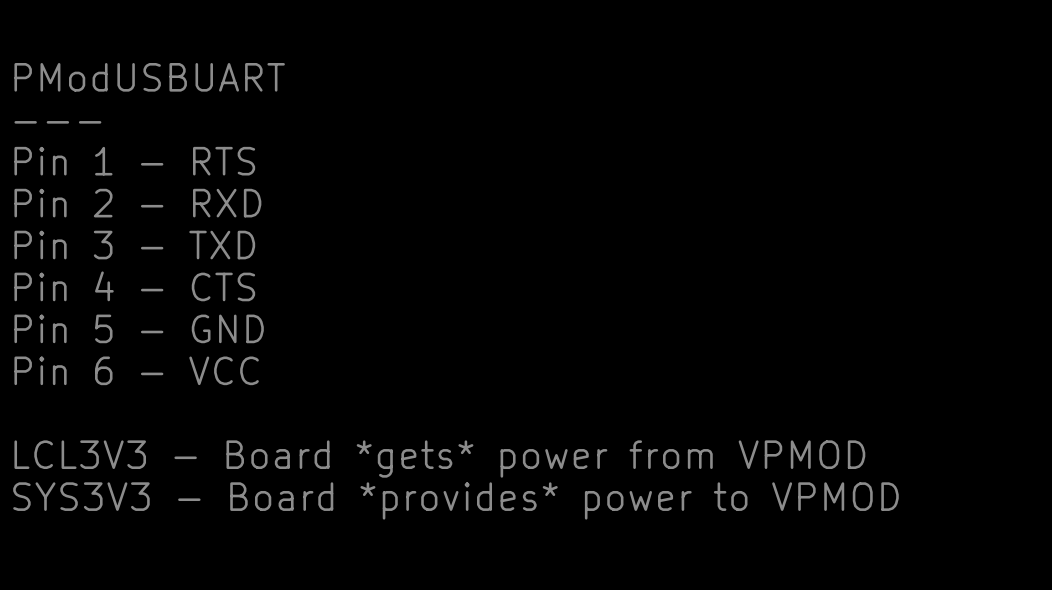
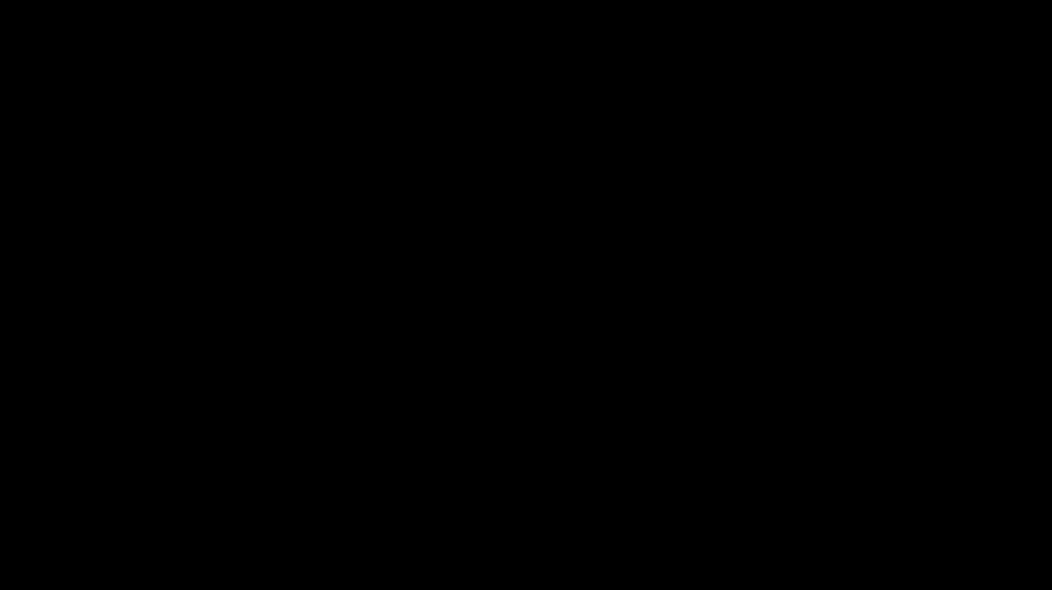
text: PModUSBUART (149, 77) -> none
text: --- (57, 122) -> none
text: Pin 1 - RTS (134, 161) -> none
text: Pin 2 - RXD (137, 203) -> none
text: Pin 3 - TXD (134, 245) -> none
text: Pin 4 - CTS (134, 286) -> none
text: Pin 5 - GND (139, 328) -> none
text: Pin 6 - VCC (136, 370) -> none
text: LCL3V3 - Board *gets* power from VPMOD (439, 459) -> none
text: SYS3V3 - Board *provides* power to VPMOD (455, 500) -> none

